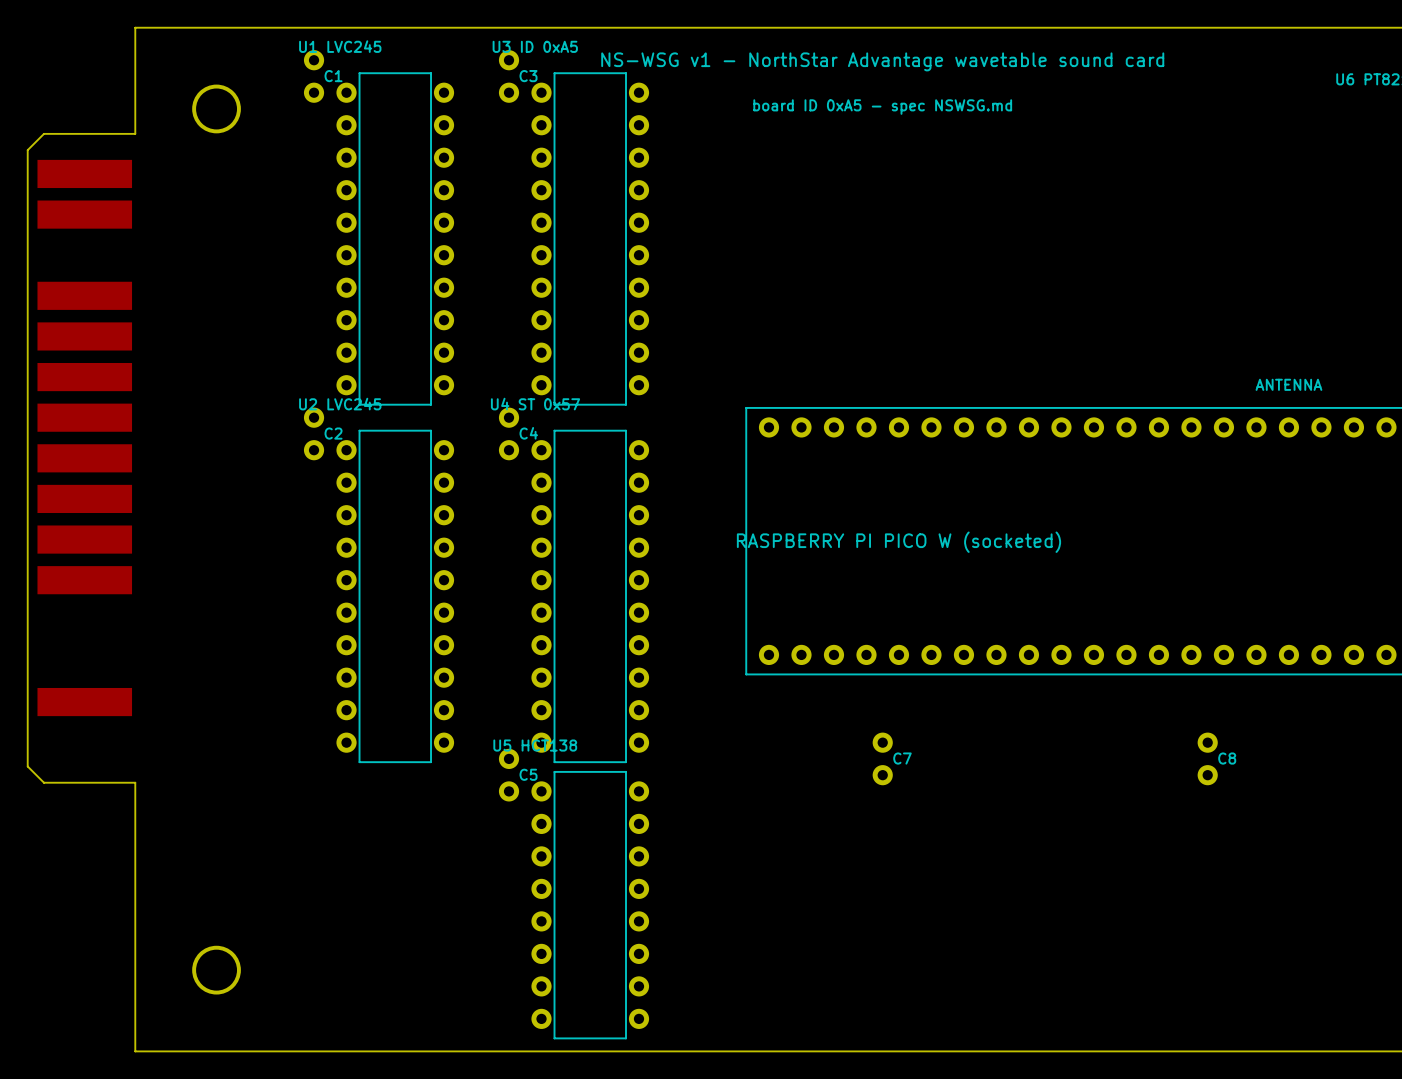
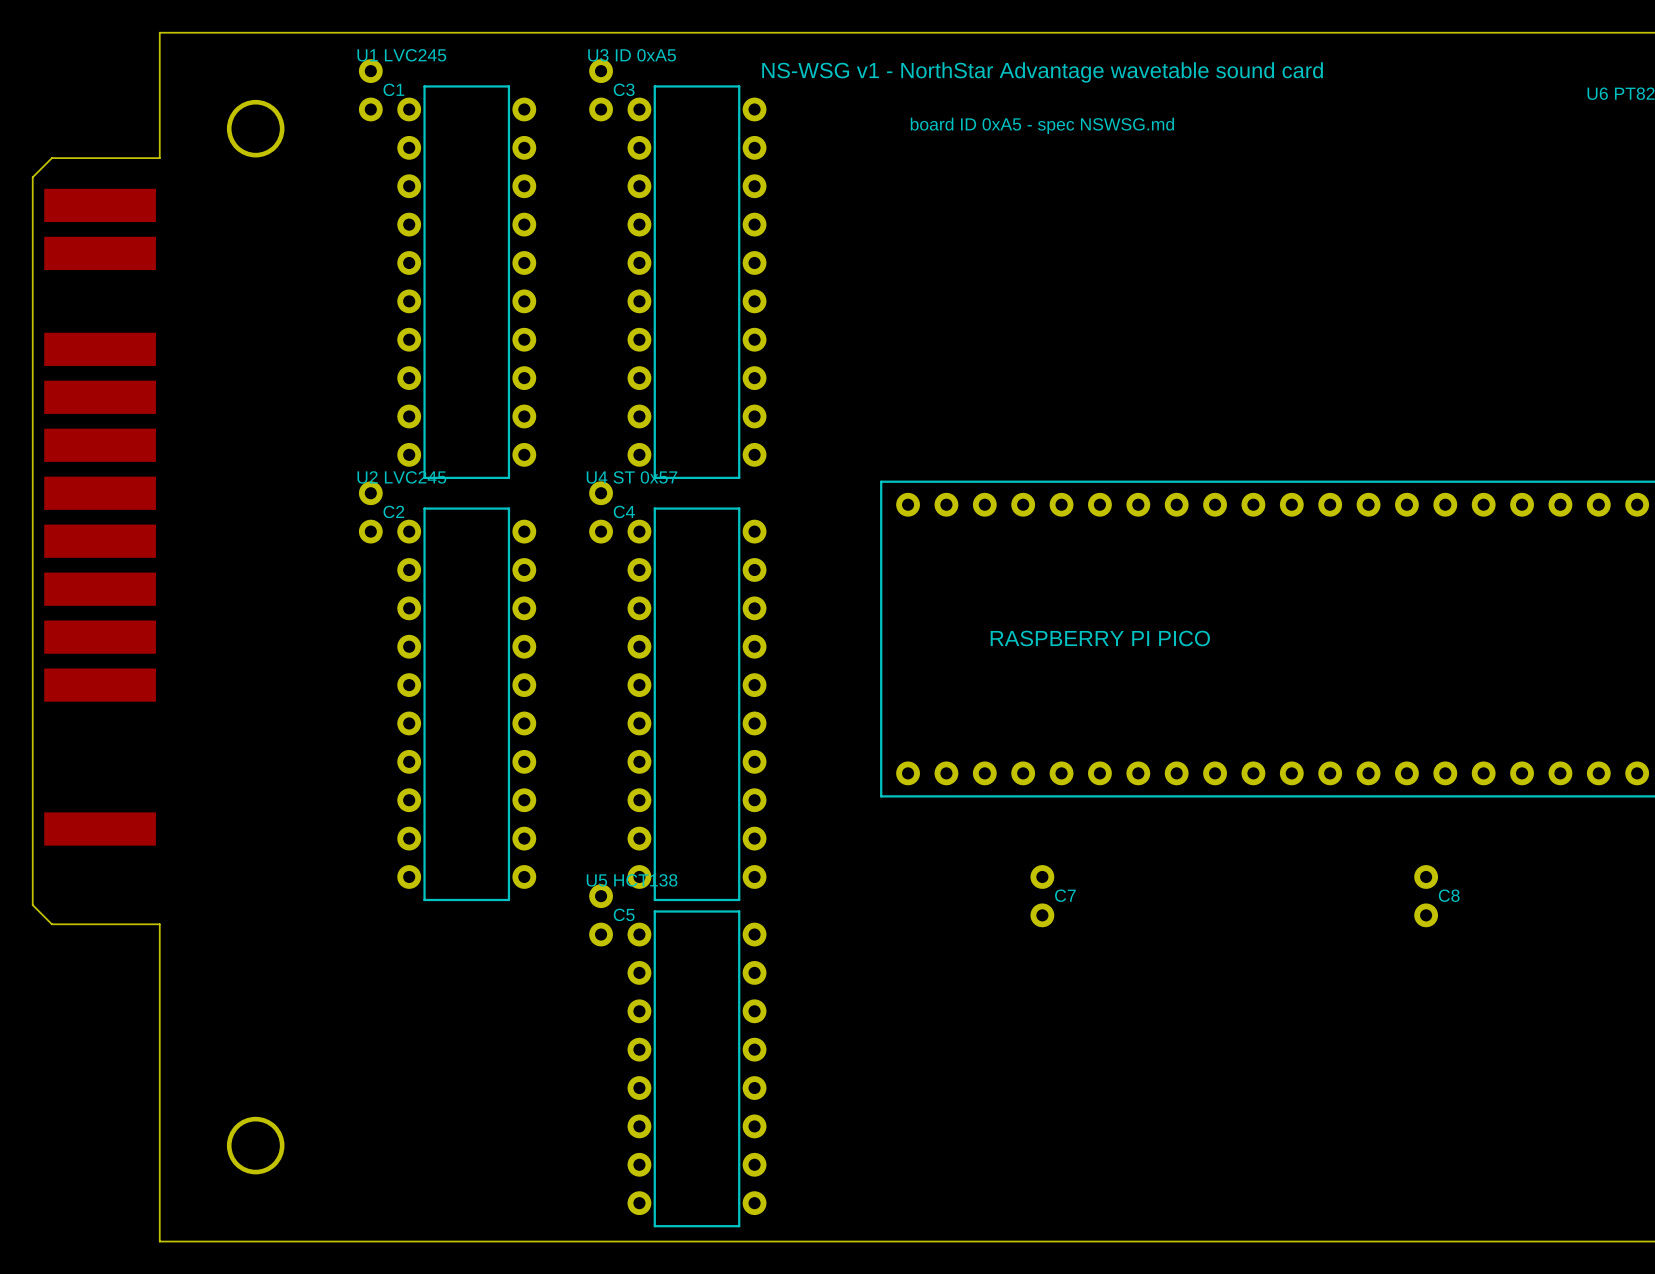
text: ANTENNA (1288, 384) -> none
text: RASPBERRY PI PICO W (socketed) (898, 542) -> RASPBERRY PI PICO (1100, 638)

